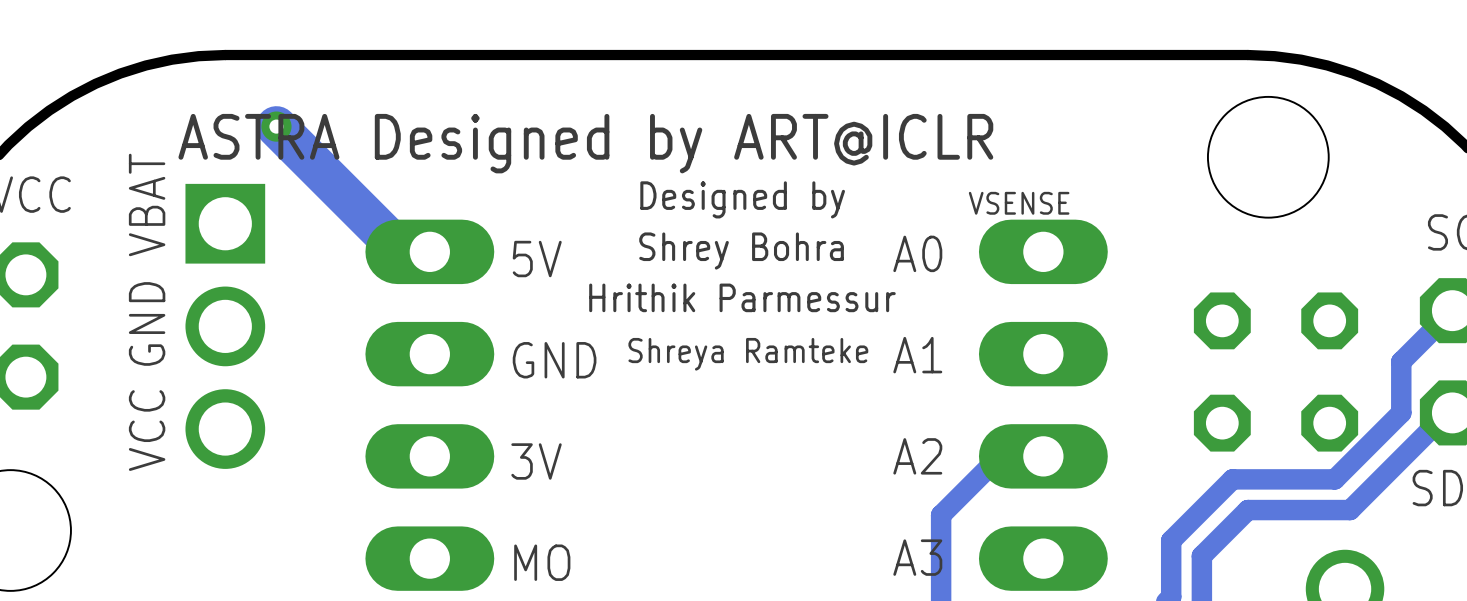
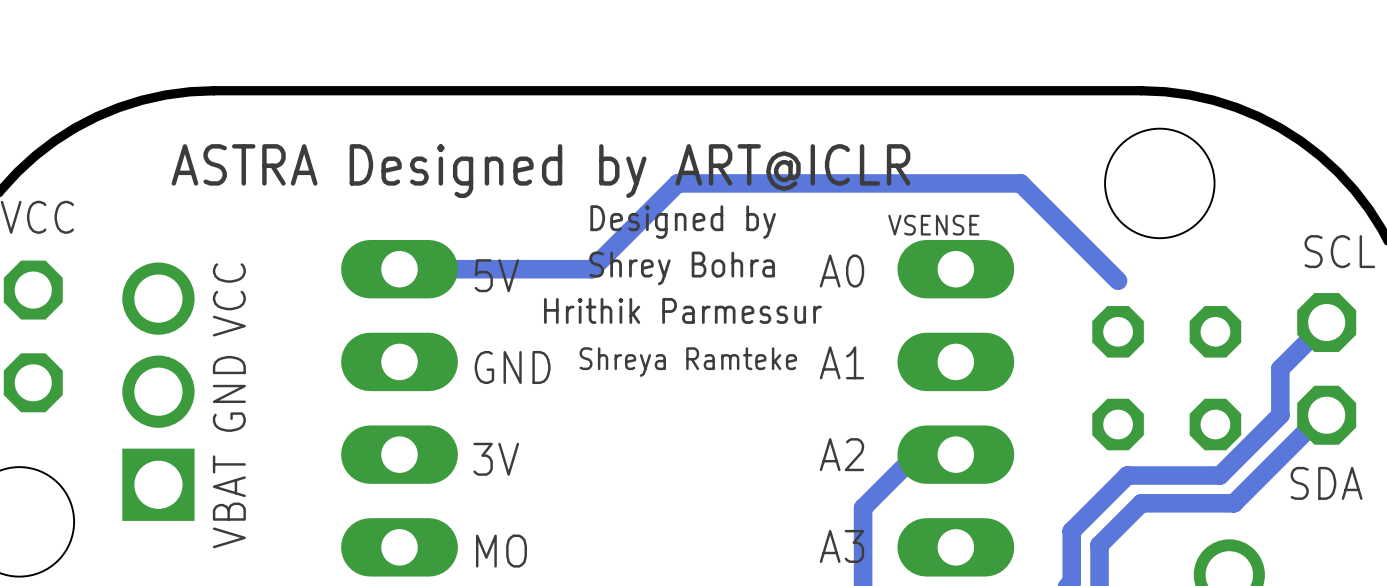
track: (276, 126) (401, 251) (429, 251) -> (1118, 280) (1020, 183) (677, 183) (591, 269) (399, 269)
via: (276, 126) -> none
text position: VBAT (147, 204) -> VBAT (229, 501)
text position: GND (147, 323) -> GND (229, 393)
part rotation: 0° (225, 326) -> 180° (158, 391)
text position: VCC (147, 430) -> VCC (229, 299)

